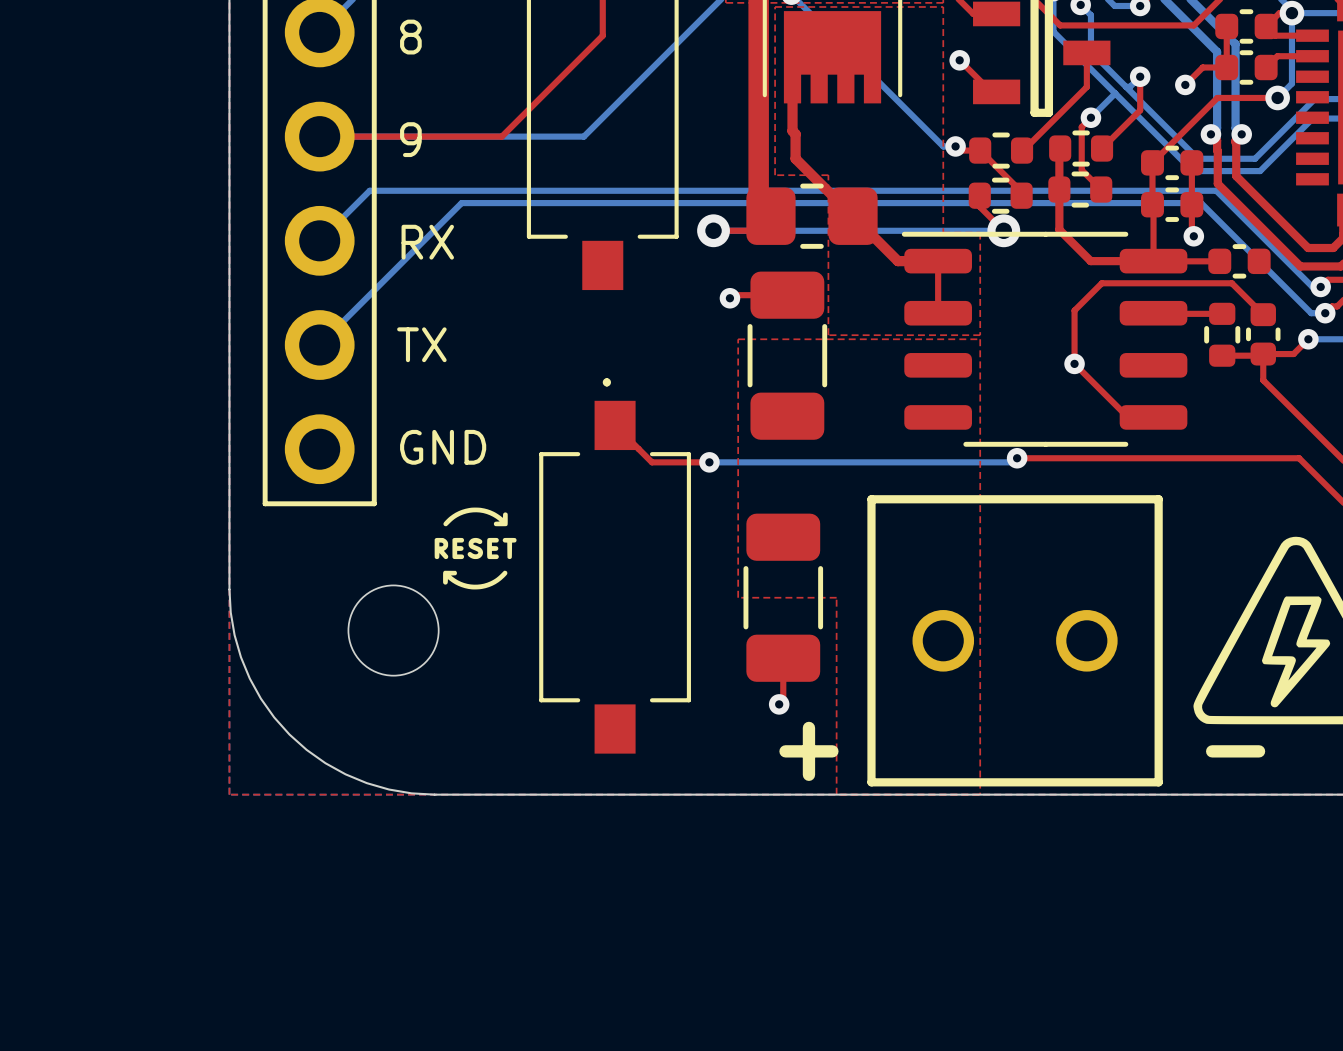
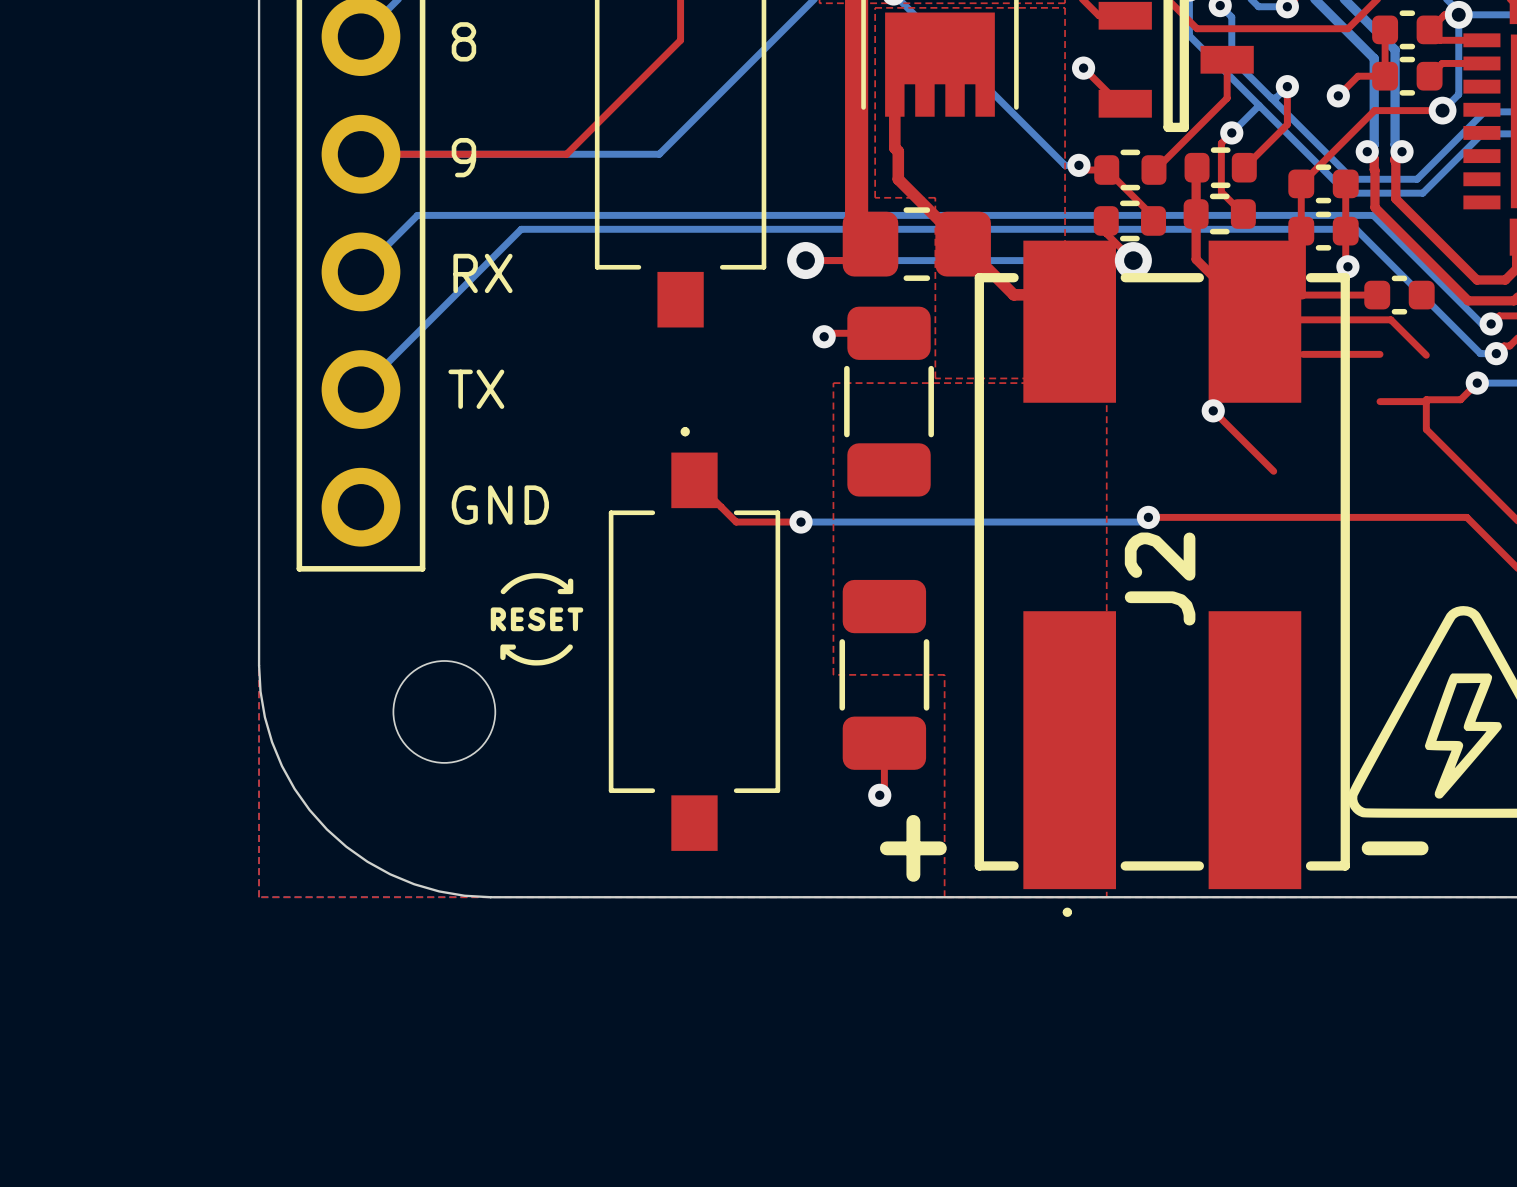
part: (1222, 334) -> none
part: (1263, 334) -> none
part: (1044, 339) -> none
J2: none -> (1162, 578)
part: (1015, 640) -> none

